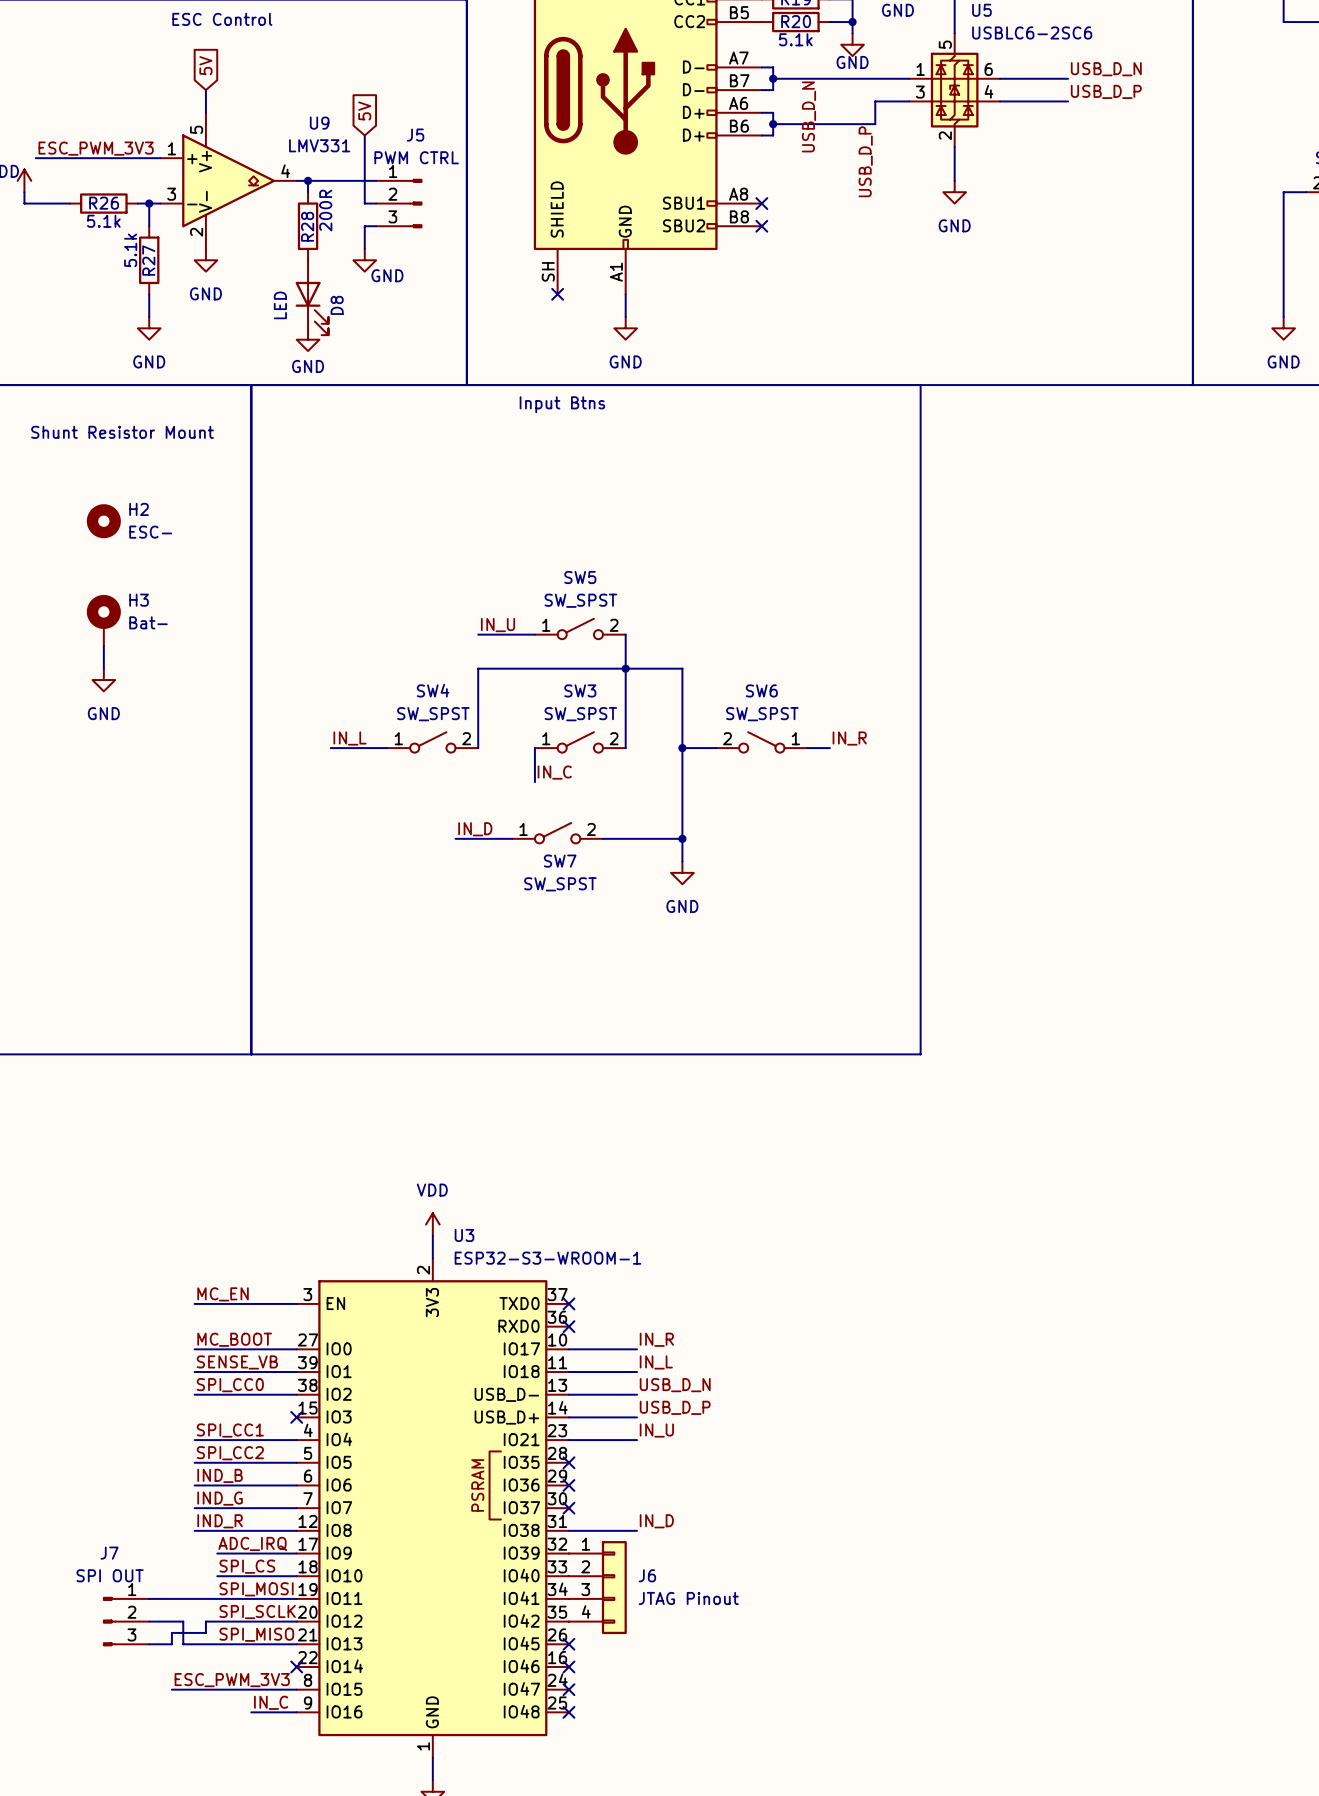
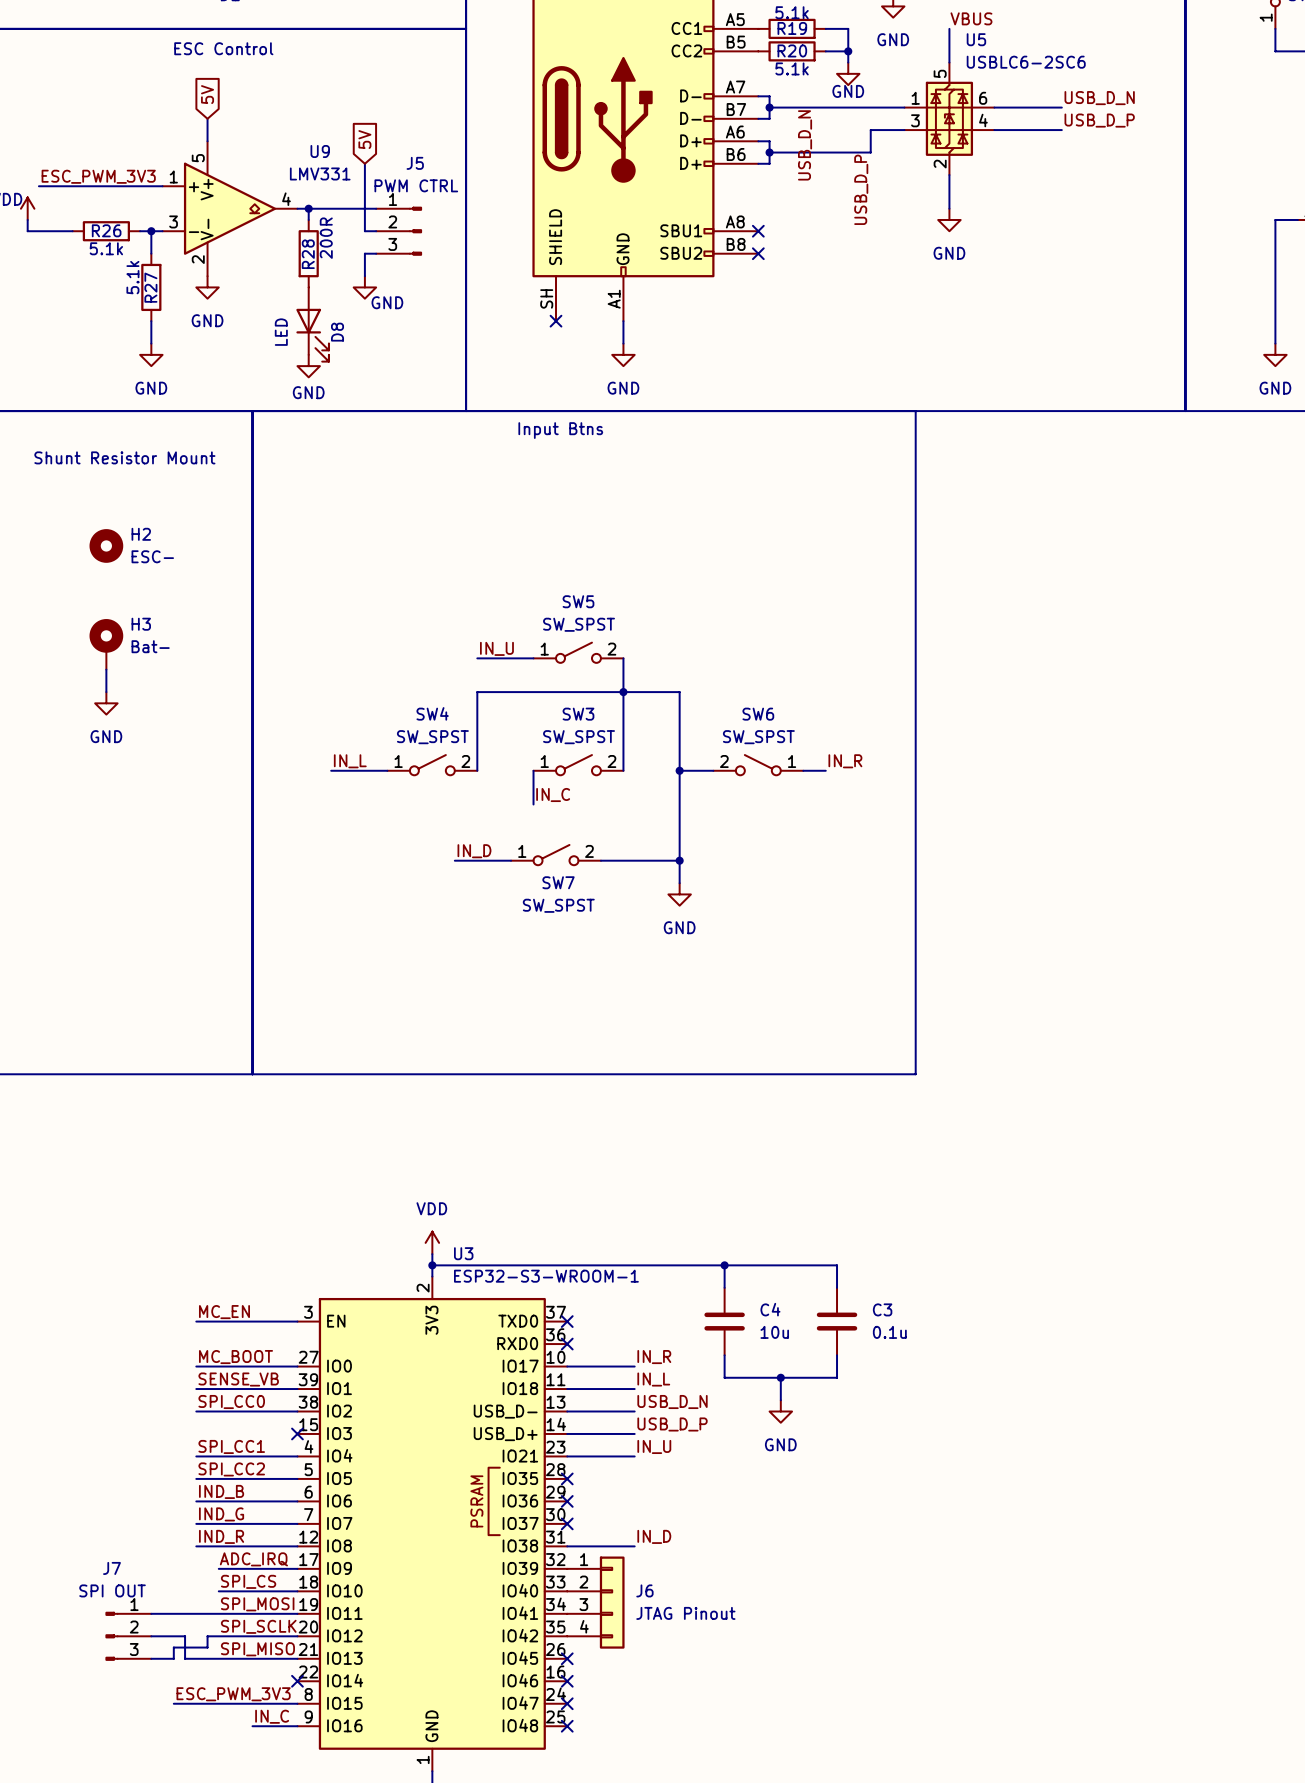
wire: none -> (432, 1265) (837, 1265) (837, 1287)
junction: none -> (432, 1265)
wire: none -> (724, 1265) (724, 1287)
junction: none -> (724, 1265)
C4: none -> 10u (724, 1321)
C3: none -> 0.1u (837, 1321)
wire: none -> (724, 1355) (724, 1377) (837, 1377) (837, 1355)
wire: none -> (780, 1377) (780, 1400)
junction: none -> (780, 1377)
power symbol: none -> GND (780, 1411)

